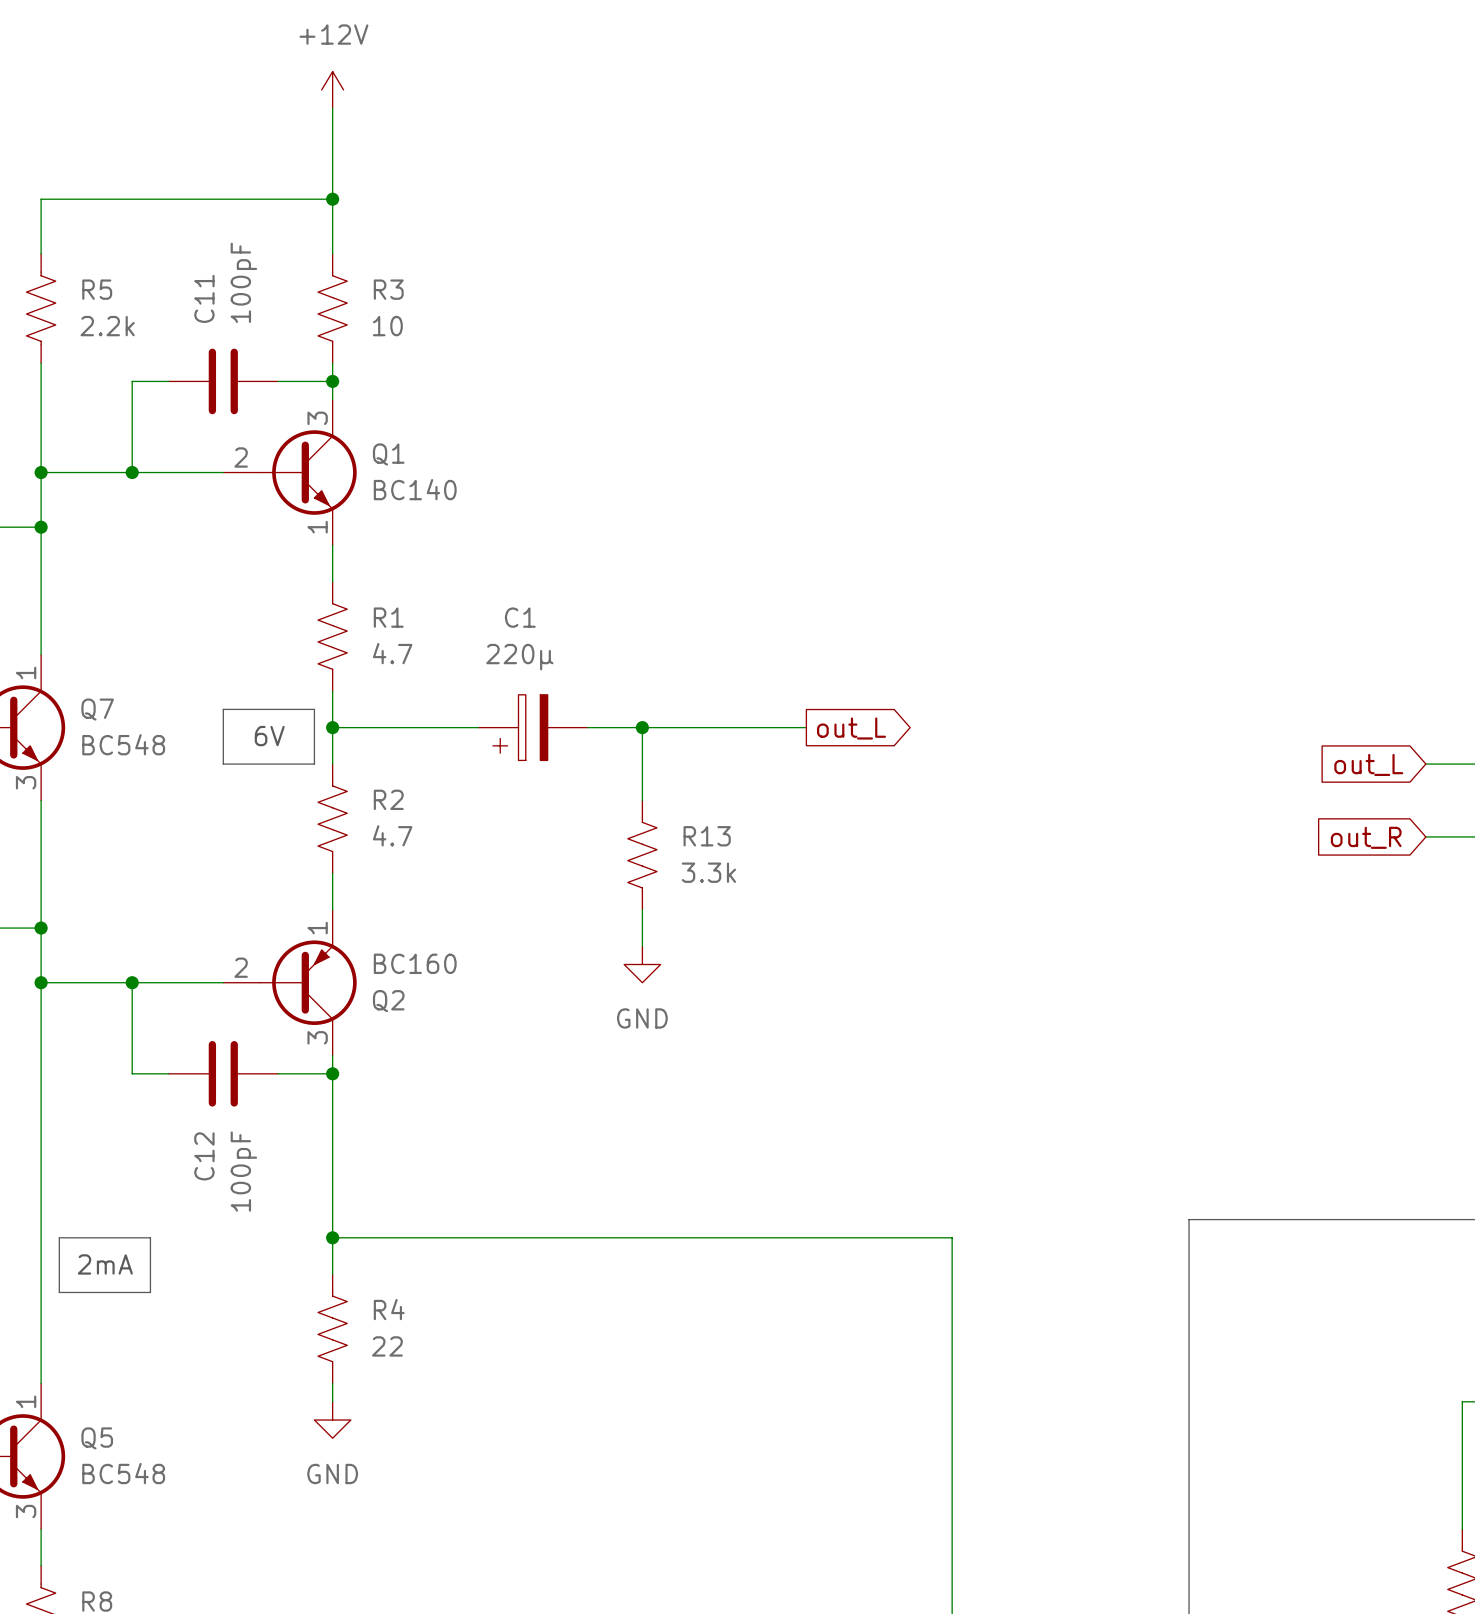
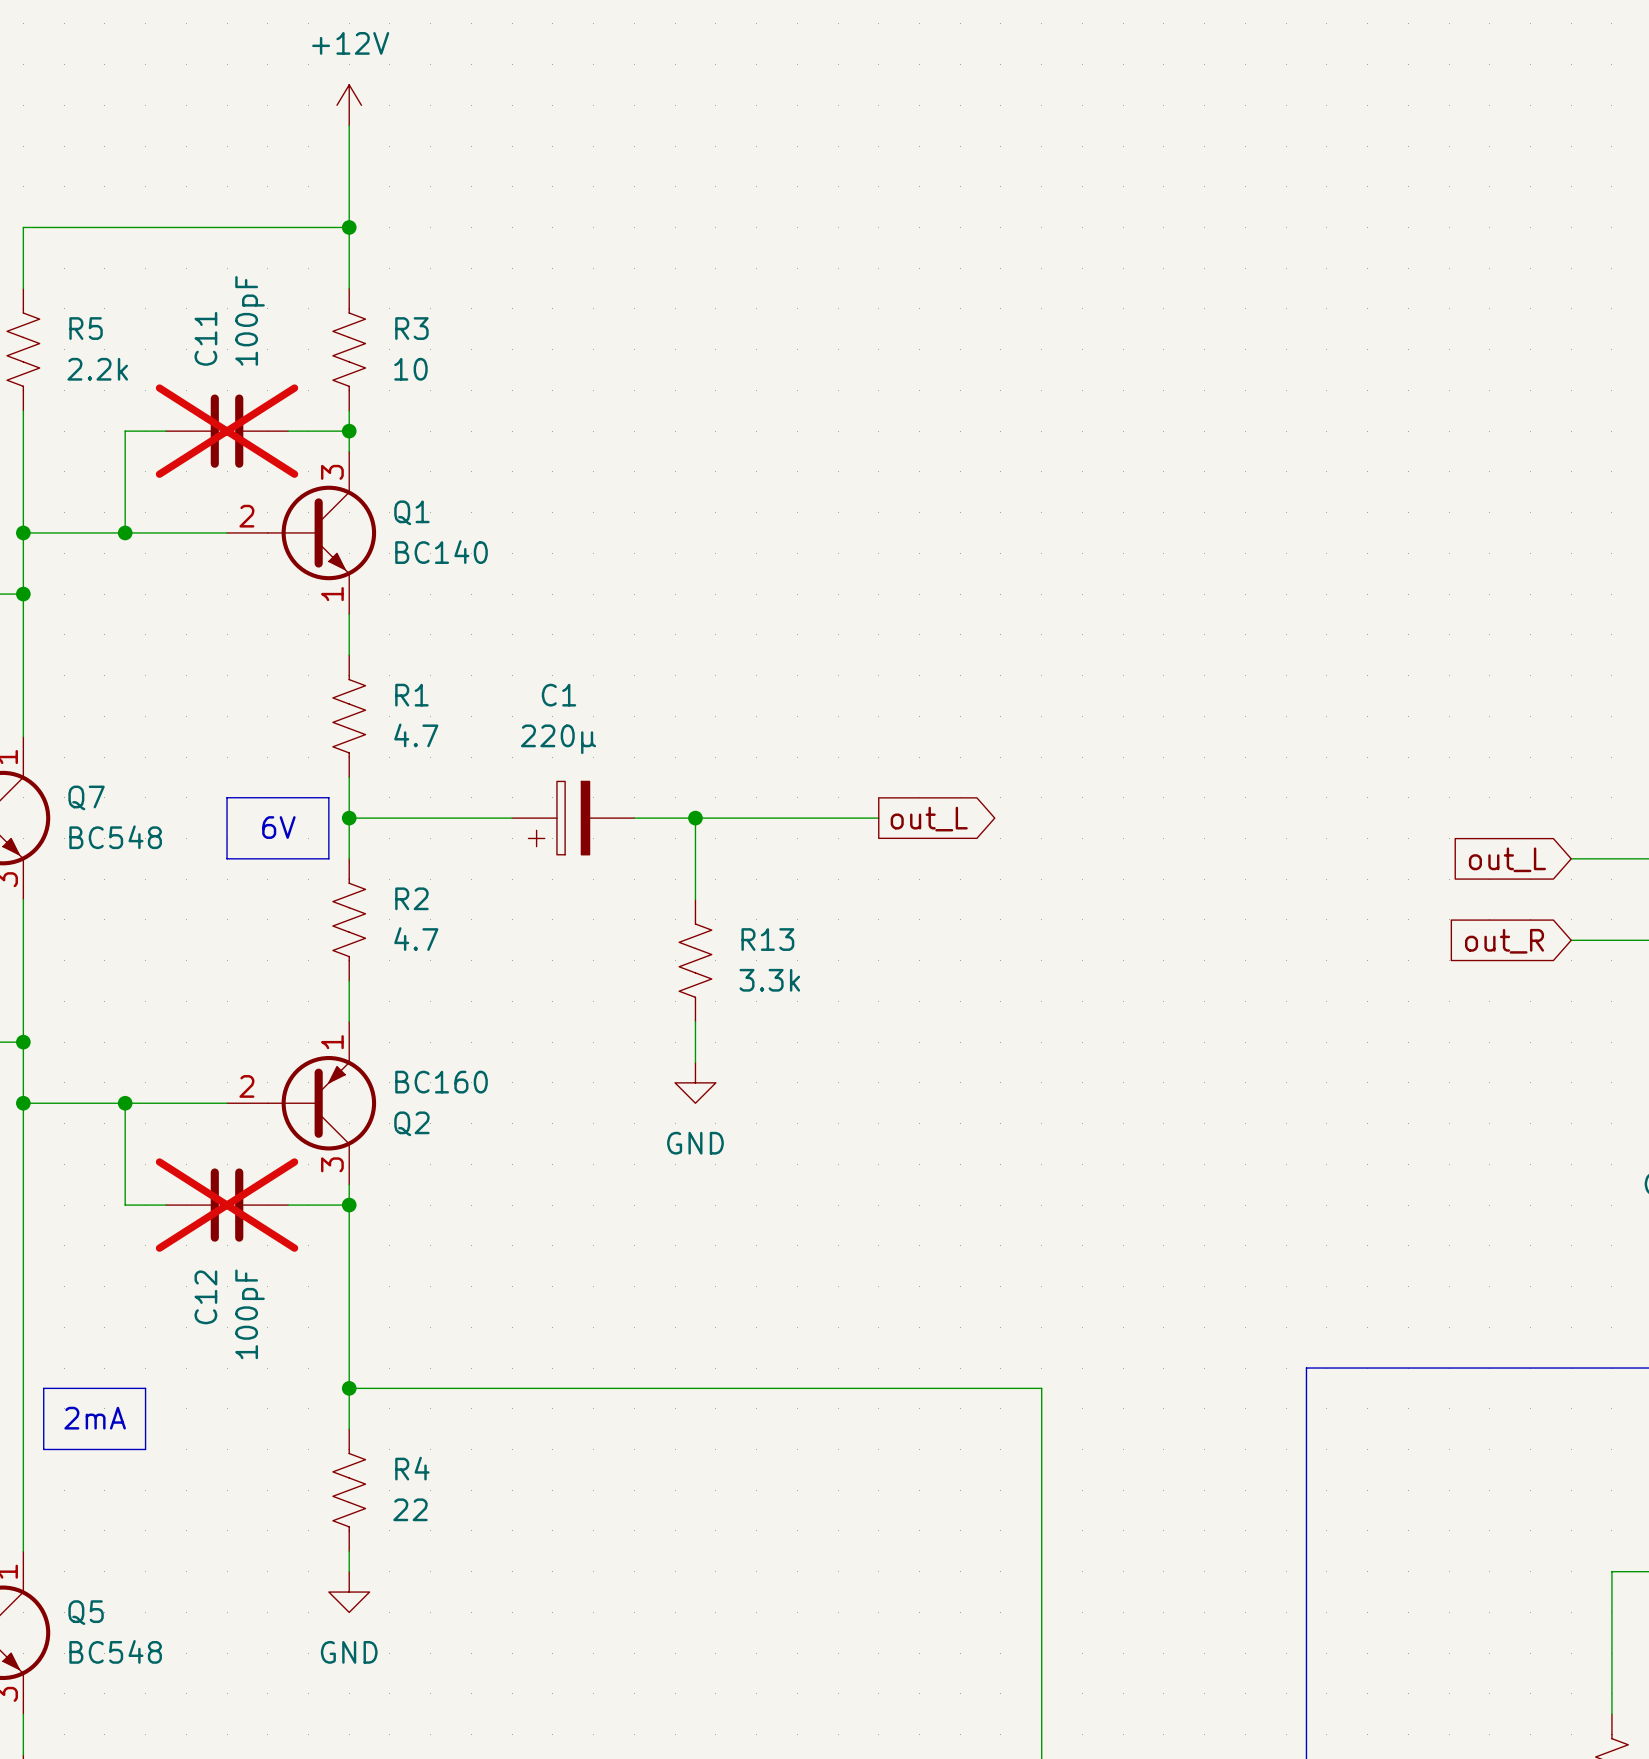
C11 do-not-place cross: none -> (227, 431)
C12 do-not-place cross: none -> (227, 1205)

